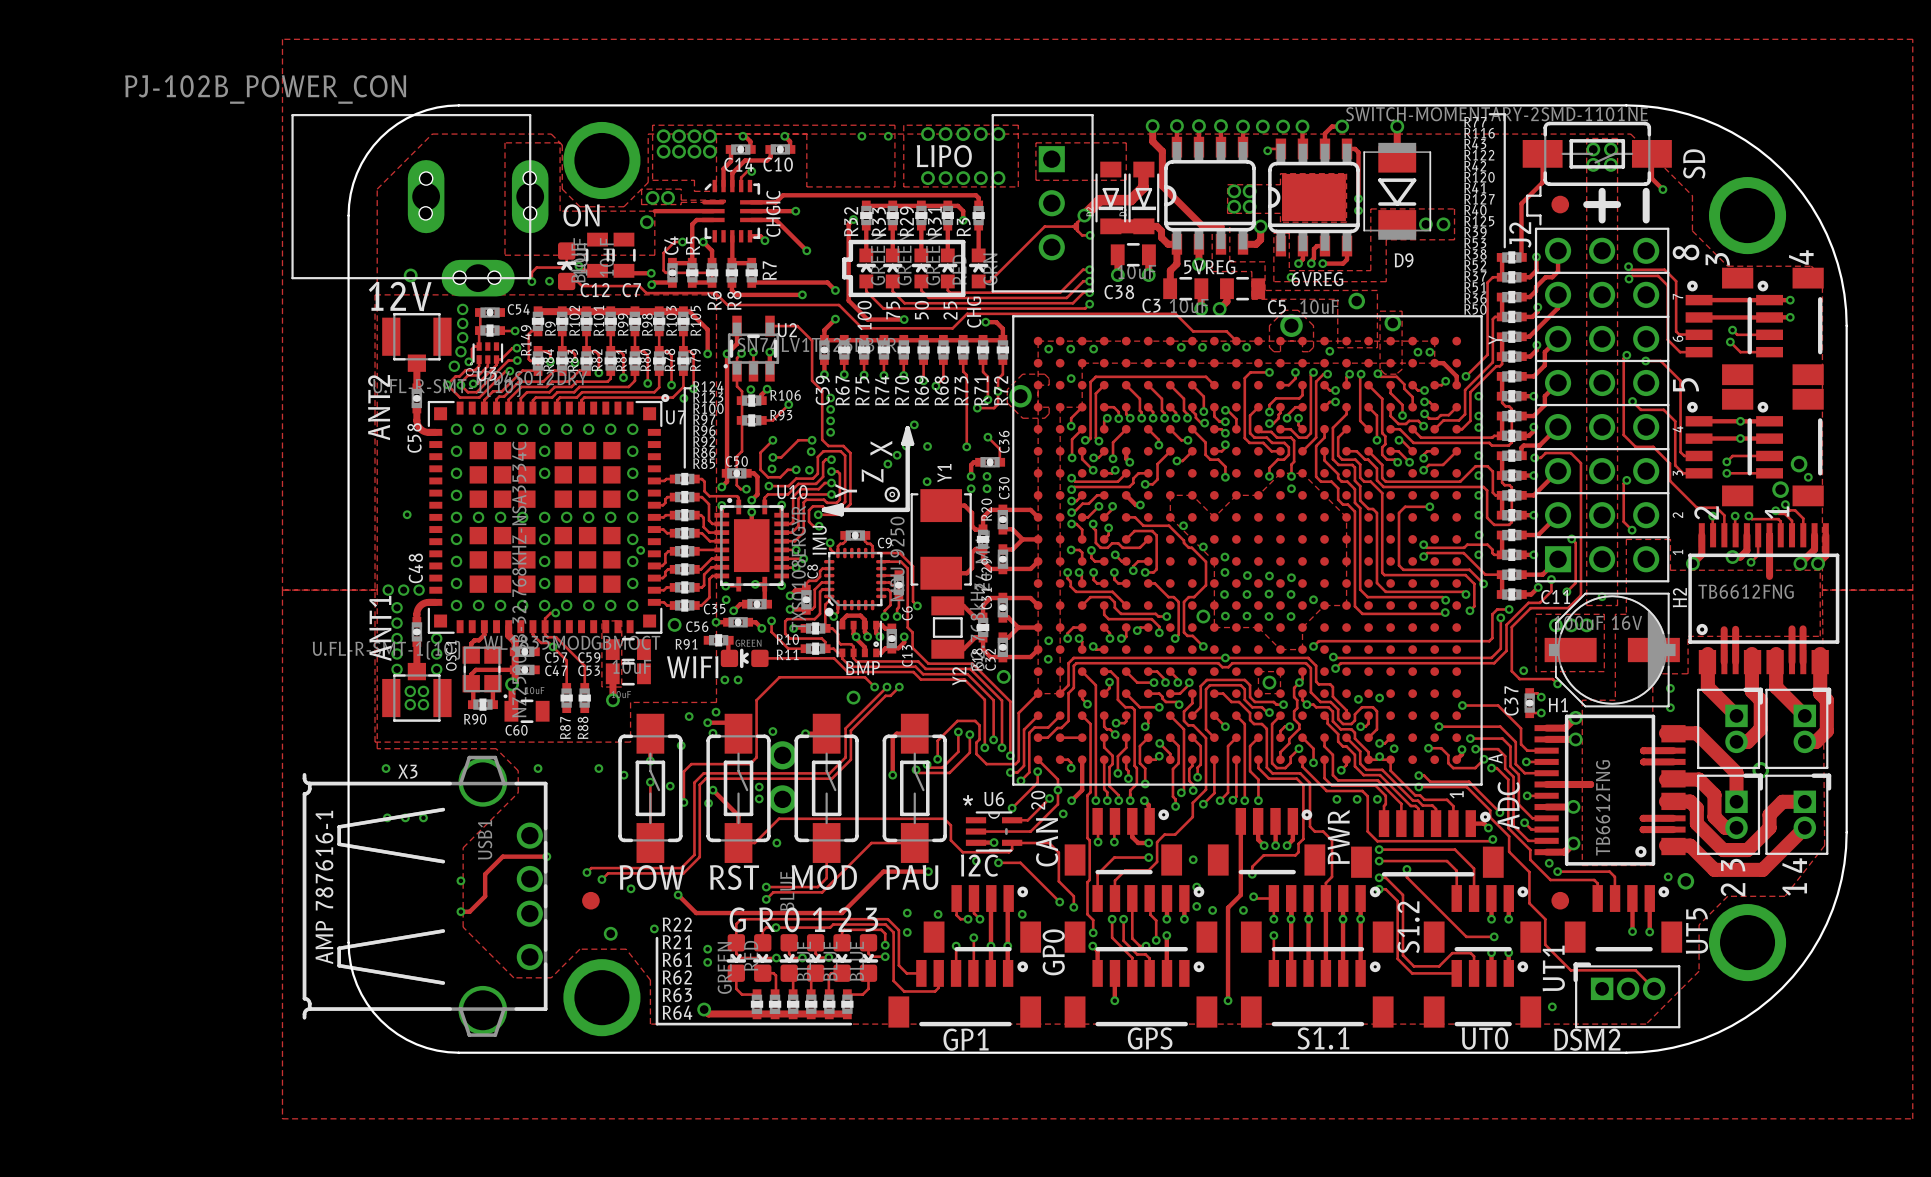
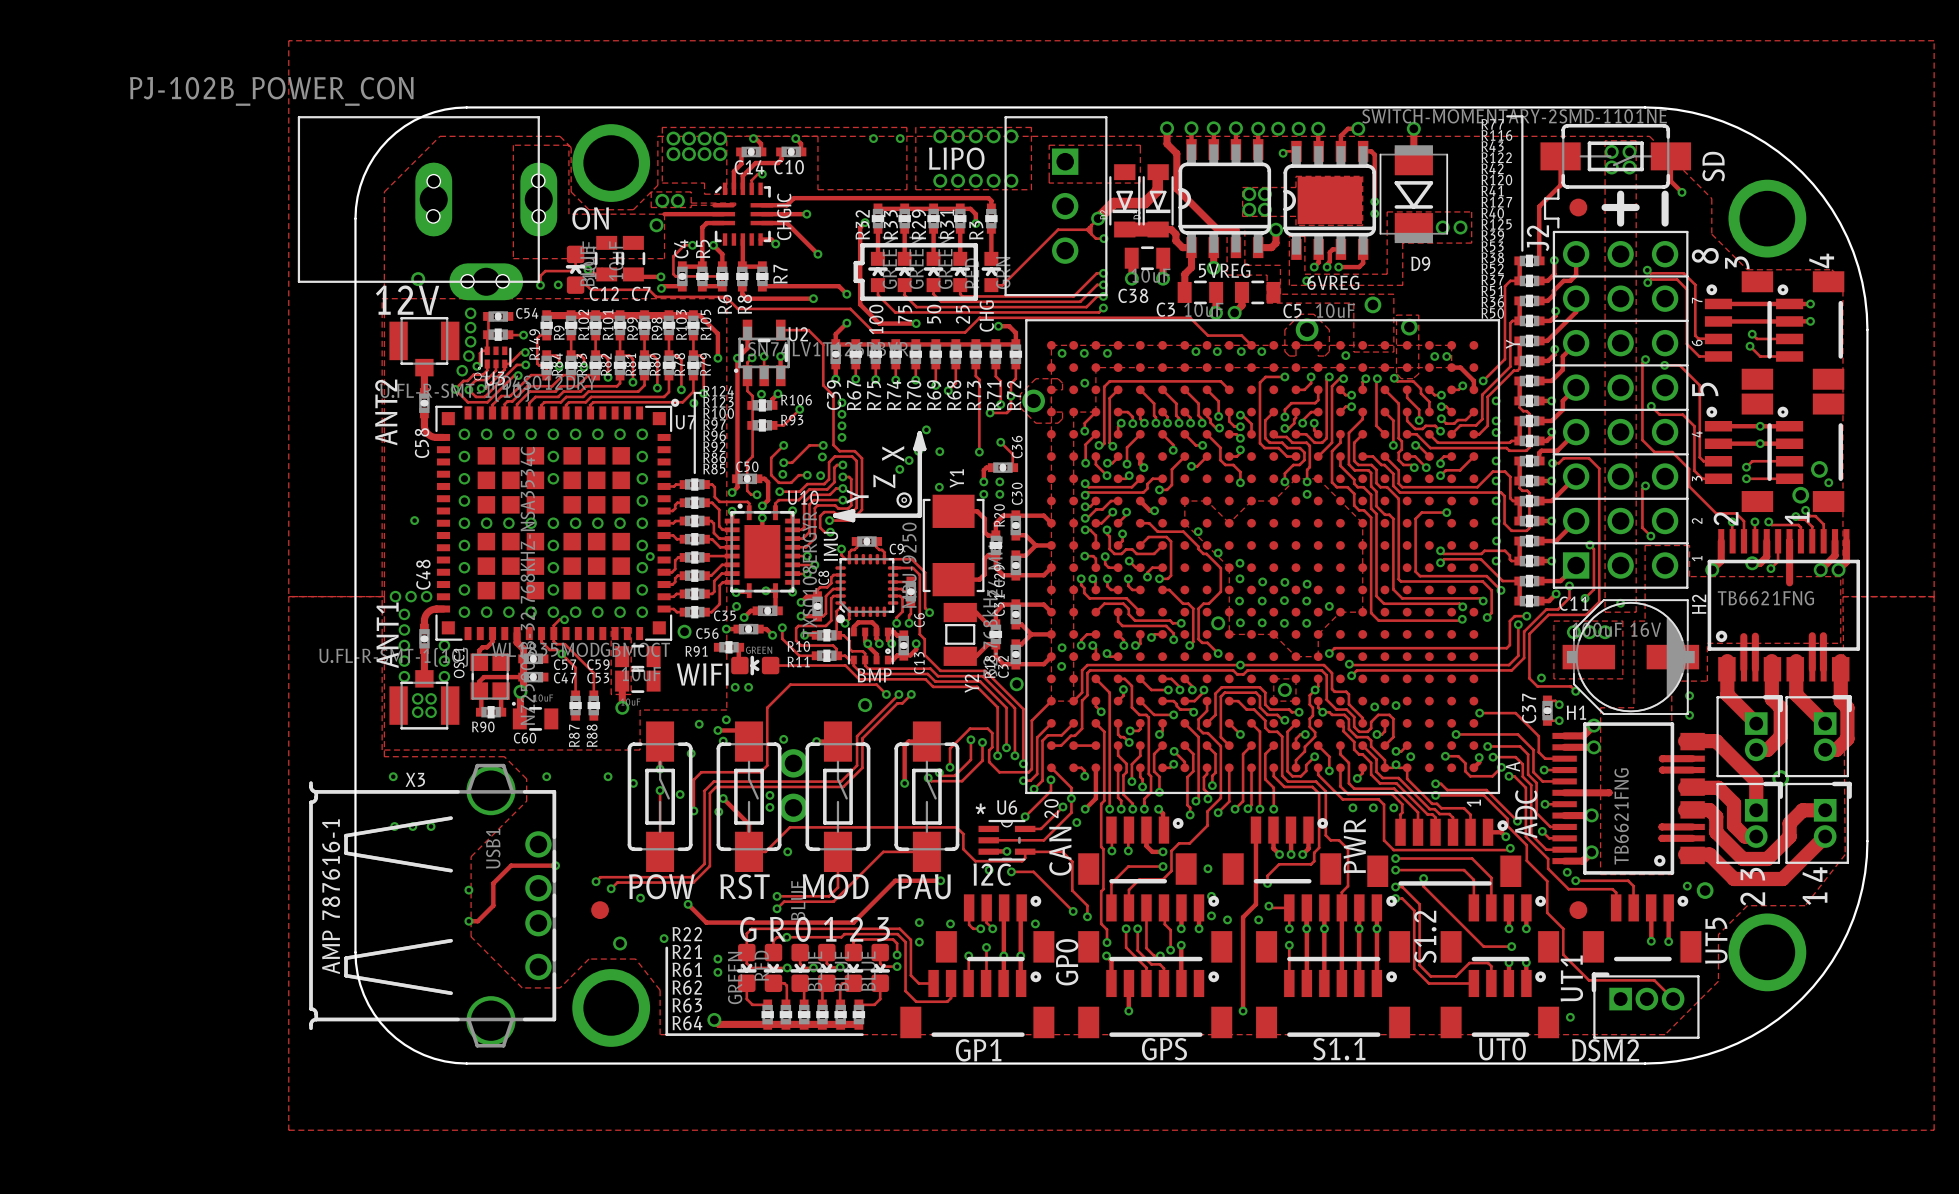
H2 value: TB6612FNG (1746, 591) -> TB6621FNG (1765, 598)
H1 value: TB6612FNG (1603, 807) -> TB6621FNG (1621, 816)

